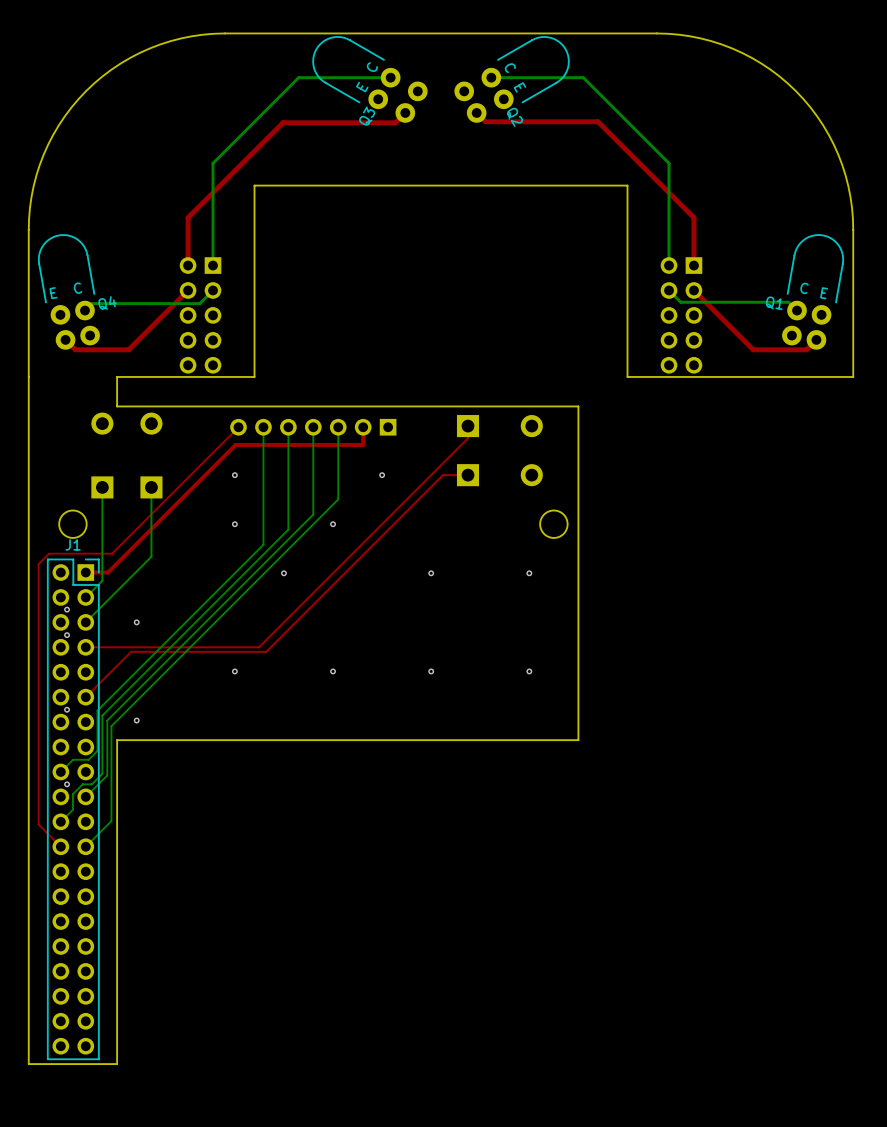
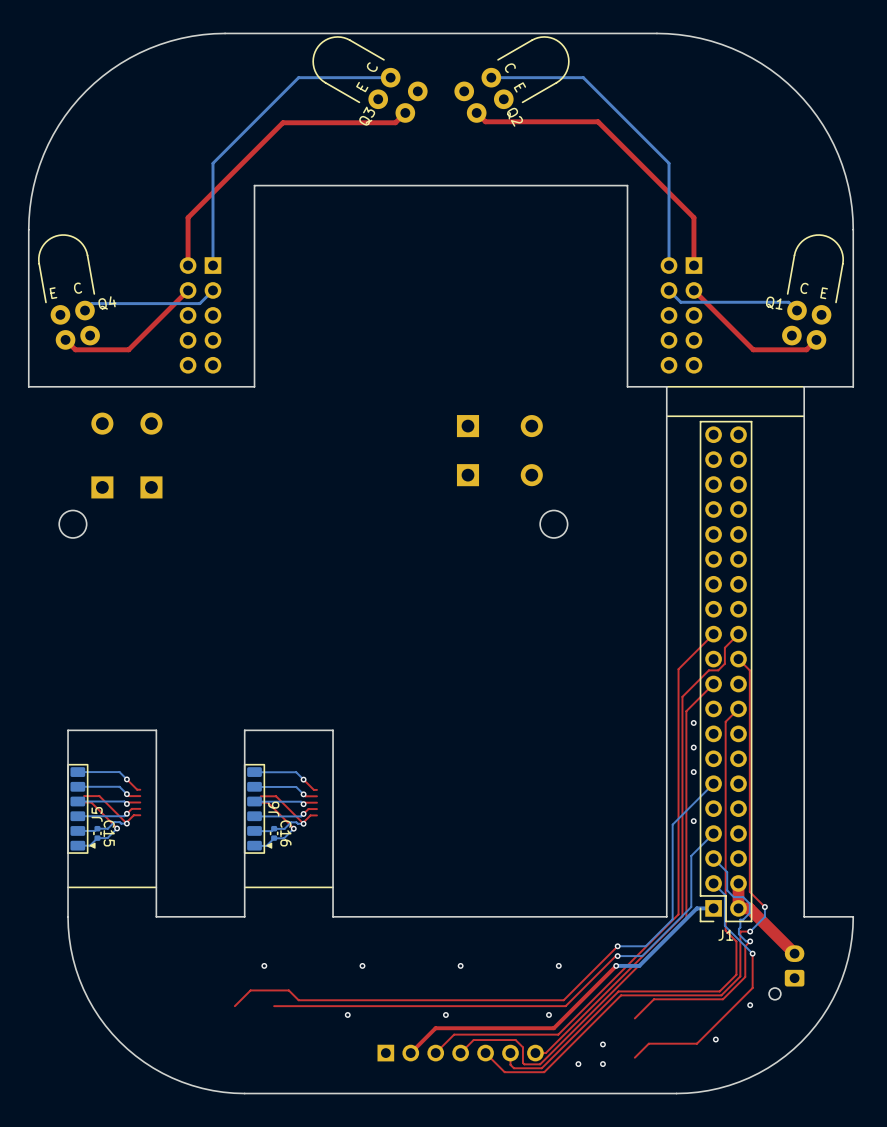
board edge: (254, 376) (117, 376) (117, 406) (578, 406) (578, 740) (117, 740) (117, 1064) (28, 1064) (28, 386) -> (254, 376) (254, 386) (28, 386)
board edge: (853, 376) (627, 376) -> (853, 376) (853, 386) (804, 386) (804, 916) (853, 916) (850, 948) (837, 989) (821, 1017) (801, 1041) (776, 1062) (749, 1077) (718, 1088) (687, 1093) (234, 1093) (192, 1085) (162, 1073) (144, 1062) (119, 1041) (99, 1017) (83, 989) (73, 959) (68, 916) (68, 730) (156, 730) (156, 916) (244, 916) (244, 730) (333, 730) (333, 916) (666, 916) (666, 386) (627, 386) (627, 376)
line: none -> (804, 386) (666, 386)
line: none -> (804, 416) (666, 416)
top track: (468, 426) (468, 438) (259, 647) (85, 647) -> none
top track: (238, 427) (112, 553) (49, 553) (38, 564) (38, 824) (60, 846) -> none
bottom track: (263, 427) (263, 544) (97, 710) (97, 750) (88, 759) (73, 759) (60, 771) -> none
bottom track: (288, 427) (288, 529) (102, 715) (102, 773) (91, 784) (82, 784) (72, 794) (72, 809) (60, 821) -> none
bottom track: (313, 427) (313, 514) (107, 720) (107, 775) (85, 796) -> none
part: (313, 427) -> none
bottom track: (338, 427) (338, 499) (111, 726) (111, 821) (85, 846) -> none
top track: (363, 427) (363, 445) (235, 445) (108, 572) (85, 572) -> none
via: (234, 475) -> none
via: (382, 475) -> none
top track: (468, 475) (442, 475) (266, 651) (131, 651) (85, 697) -> none
bottom track: (102, 487) (102, 580) (85, 597) -> none
bottom track: (151, 487) (151, 556) (85, 622) -> none
via: (234, 524) -> none
via: (333, 524) -> none
via: (283, 573) -> none
via: (431, 573) -> none
via: (529, 573) -> none
via: (67, 609) -> none
via: (136, 622) -> none
top track: none -> (713, 634) (678, 669) (678, 914) (558, 1034) (454, 1034) (435, 1053)
top track: none -> (738, 634) (724, 647) (724, 663) (718, 670) (708, 670) (682, 696) (682, 916) (545, 1053) (535, 1053)
via: (67, 635) -> none
top track: none -> (738, 659) (749, 670) (749, 891) (764, 907)
via: (234, 671) -> none
via: (333, 671) -> none
via: (431, 671) -> none
via: (529, 671) -> none
top track: none -> (713, 684) (686, 711) (686, 918) (540, 1064) (524, 1064) (522, 1047) (515, 1040) (473, 1040) (460, 1053)
top track: none -> (738, 708) (725, 721) (725, 930) (736, 941) (736, 974) (719, 991) (618, 991) (541, 1068) (513, 1068) (510, 1064) (510, 1053)
via: (67, 709) -> none
via: (136, 720) -> none
via: none -> (693, 722)
via: none -> (693, 747)
bottom track: none -> (77, 772) (119, 772) (126, 779)
bottom track: none -> (254, 772) (296, 772) (303, 779)
via: none -> (693, 772)
top track: none -> (126, 779) (137, 789) (140, 789)
via: none -> (126, 779)
top track: none -> (303, 779) (313, 789) (316, 789)
via: none -> (303, 779)
bottom track: none -> (713, 783) (672, 824) (672, 919) (645, 946) (617, 946)
via: (67, 784) -> none
bottom track: none -> (77, 786) (119, 786) (126, 794)
bottom track: none -> (254, 786) (296, 786) (303, 794)
top track: none -> (126, 794) (128, 796) (140, 796)
via: none -> (126, 794)
top track: none -> (303, 794) (305, 796) (316, 796)
via: none -> (303, 794)
top track: none -> (84, 796) (99, 796) (126, 823) (133, 815) (140, 815)
top track: none -> (260, 796) (276, 796) (303, 823) (310, 815) (316, 815)
bottom track: none -> (77, 801) (124, 801) (126, 803)
bottom track: none -> (254, 801) (301, 801) (303, 804)
top track: none -> (84, 802) (91, 802) (117, 828)
top track: none -> (140, 802) (126, 803)
top track: none -> (260, 802) (268, 802) (293, 828)
top track: none -> (316, 802) (303, 804)
via: none -> (126, 803)
via: none -> (303, 804)
J5: none -> (81, 808)
top track: none -> (140, 808) (131, 808) (126, 813)
J6: none -> (258, 808)
J1 rotation: 0° (73, 809) -> 180° (726, 671)
J1 position: (73, 809) -> (726, 671)
top track: none -> (316, 809) (308, 809) (303, 813)
bottom track: none -> (126, 813) (124, 816) (77, 816)
via: none -> (126, 813)
bottom track: none -> (303, 813) (301, 816) (254, 816)
via: none -> (303, 813)
via: none -> (693, 821)
bottom track: none -> (126, 823) (114, 822) (107, 828) (77, 830)
via: none -> (126, 823)
bottom track: none -> (303, 823) (291, 822) (284, 828) (254, 831)
via: none -> (303, 823)
bottom track: none -> (117, 828) (107, 838) (97, 838) (89, 845) (77, 845)
via: none -> (117, 828)
bottom track: none -> (293, 828) (284, 838) (274, 838) (266, 845) (254, 845)
via: none -> (293, 828)
C15: none -> (97, 833)
C16: none -> (274, 833)
bottom track: none -> (713, 833) (691, 855) (691, 907) (642, 956) (617, 956)
bottom track: none -> (713, 858) (727, 872) (727, 890) (733, 897) (743, 897) (749, 903) (749, 913) (743, 919) (740, 919) (738, 934) (746, 941) (750, 941)
bottom track: none -> (713, 883) (724, 894) (724, 925) (752, 953)
top track: none -> (738, 883) (738, 908) (749, 908) (794, 953)
line: none -> (156, 887) (68, 887)
line: none -> (333, 887) (244, 887)
bottom track: none -> (764, 907) (764, 916) (750, 931)
via: none -> (764, 907)
bottom track: none -> (713, 908) (696, 908) (639, 965) (616, 965)
top track: none -> (750, 931) (740, 931) (740, 976) (721, 995) (621, 995) (544, 1072) (504, 1072) (485, 1053)
via: none -> (750, 931)
top track: none -> (750, 941) (745, 946) (745, 977) (722, 999) (653, 999) (634, 1018)
via: none -> (750, 941)
top track: none -> (617, 946) (563, 1000) (298, 1000) (288, 990) (250, 990) (234, 1006)
via: none -> (617, 946)
top track: none -> (752, 953) (752, 988) (696, 1043) (648, 1043) (634, 1057)
via: none -> (752, 953)
top track: none -> (617, 956) (565, 1006) (274, 1006)
via: none -> (617, 956)
via: none -> (264, 965)
via: none -> (362, 965)
via: none -> (460, 965)
via: none -> (558, 965)
top track: none -> (616, 965) (553, 1028) (435, 1028) (410, 1053)
via: none -> (616, 965)
part: none -> (786, 972)
via: none -> (750, 1005)
via: none -> (347, 1014)
via: none -> (445, 1014)
via: none -> (548, 1014)
via: none -> (715, 1039)
via: none -> (602, 1044)
part: none -> (460, 1053)
via: none -> (578, 1064)
via: none -> (602, 1064)

